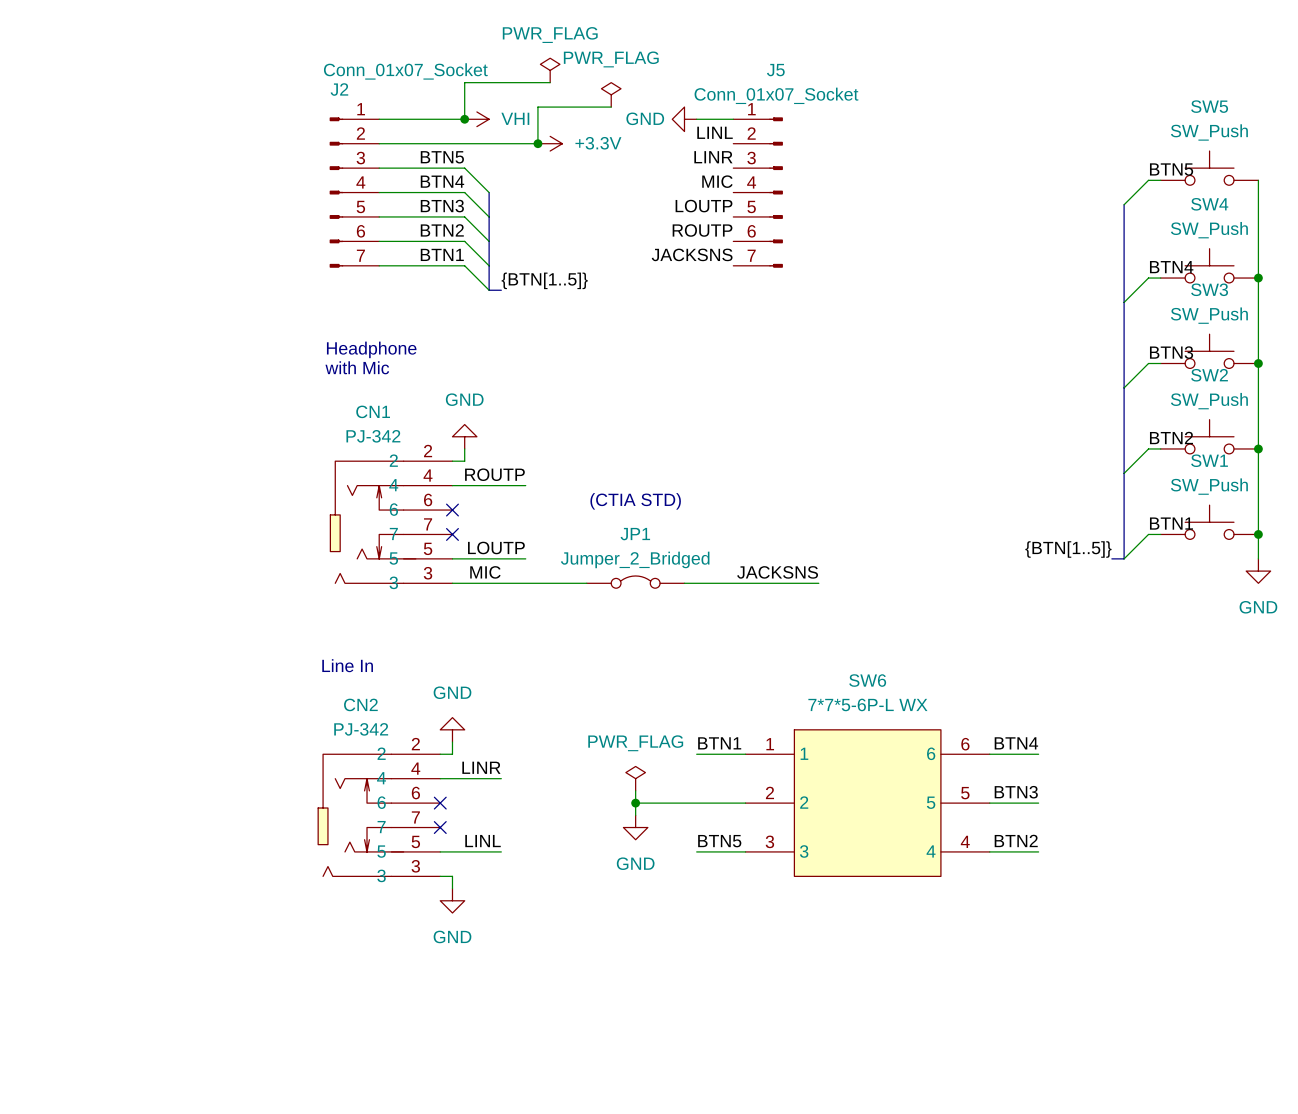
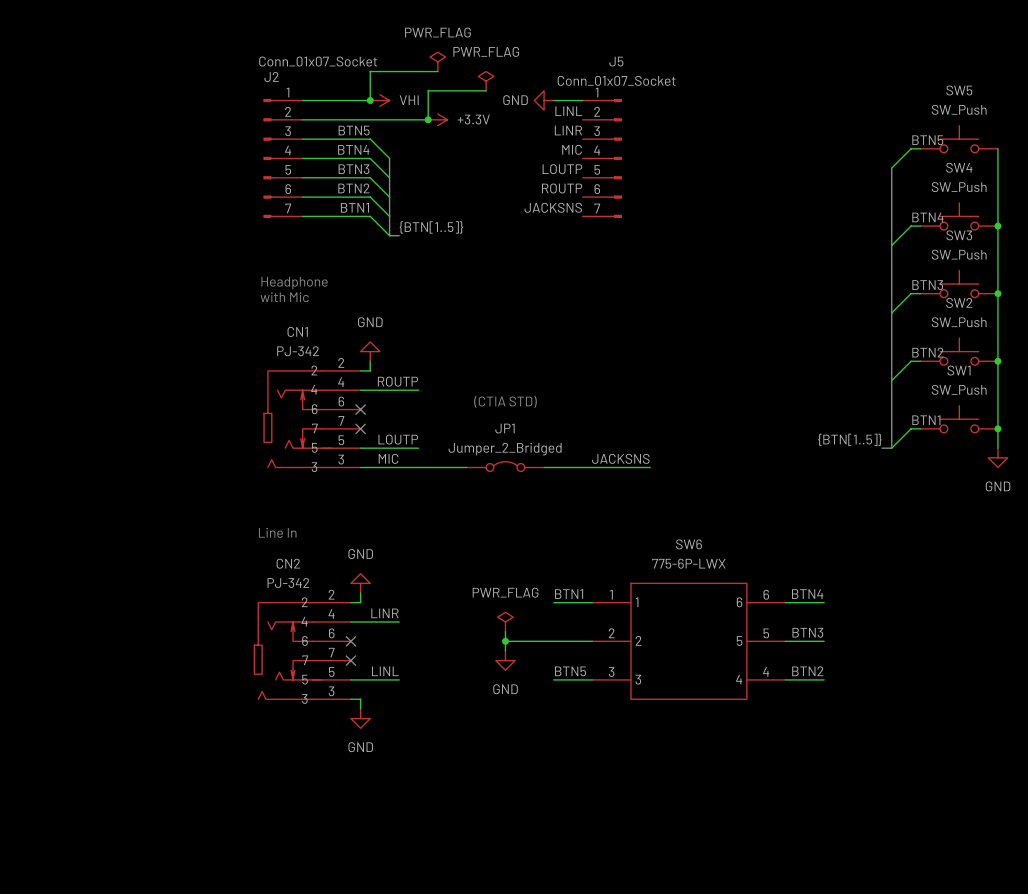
SW6 value: 7*7*5-6P-L WX (867, 704) -> 775-6P-LWX (688, 563)

